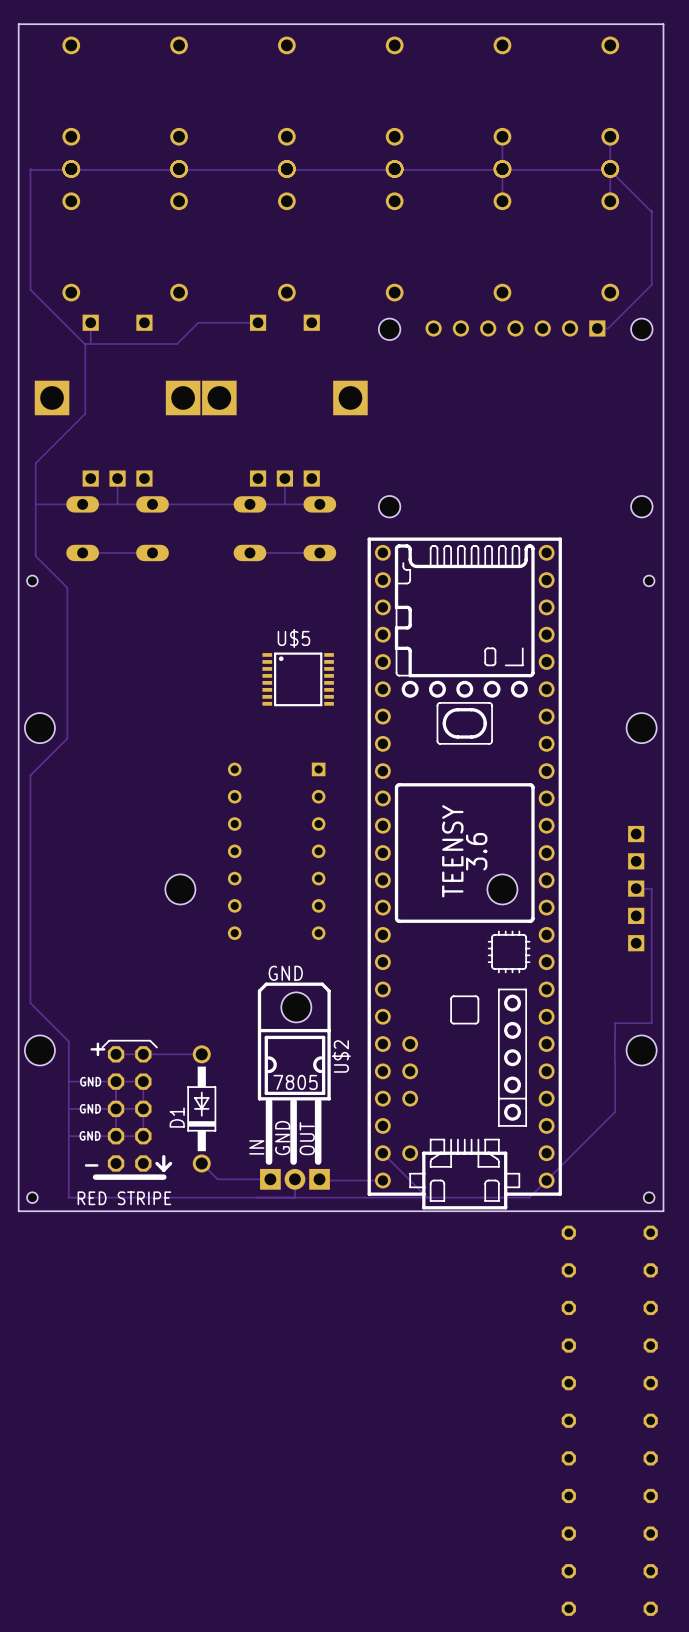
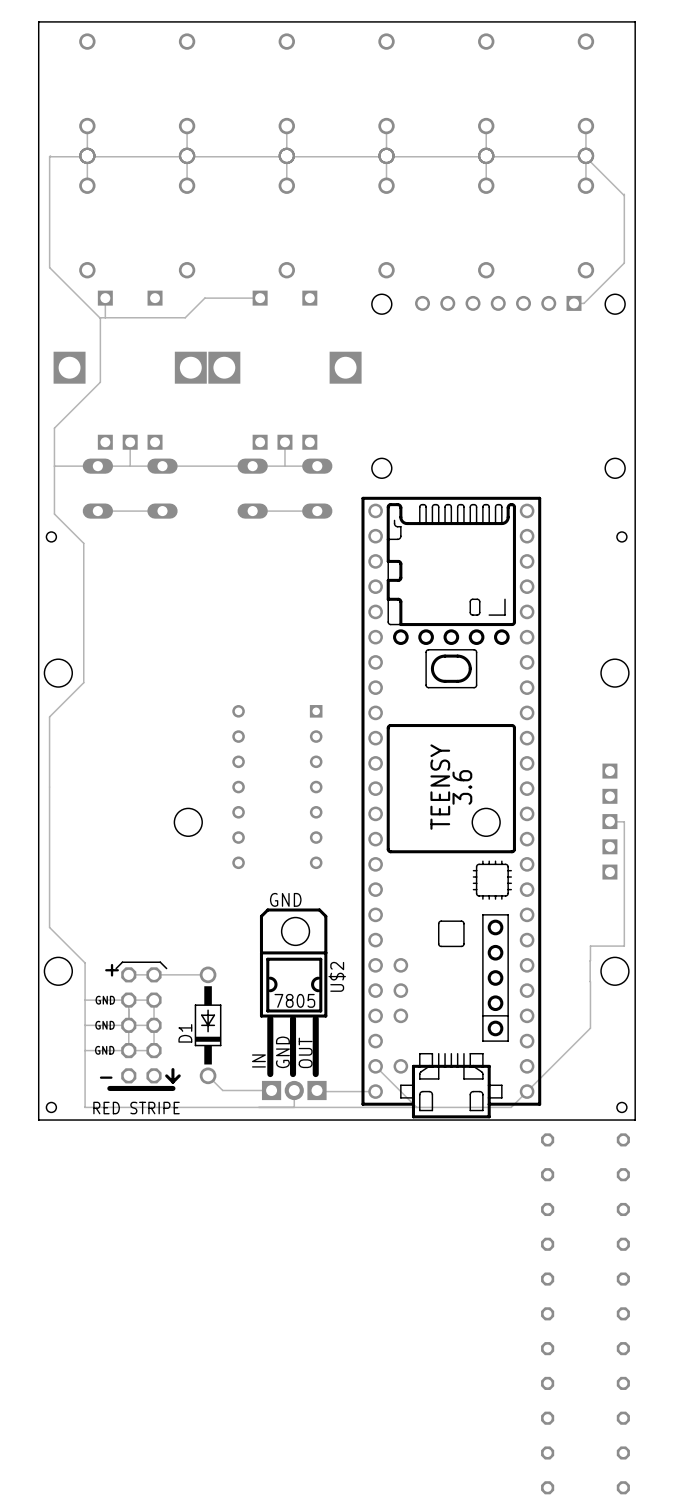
track: none -> (87, 126) (87, 185)
track: none -> (187, 126) (187, 185)
track: none -> (286, 126) (286, 185)
track: none -> (386, 126) (386, 185)
U$5: (298, 679) -> none

